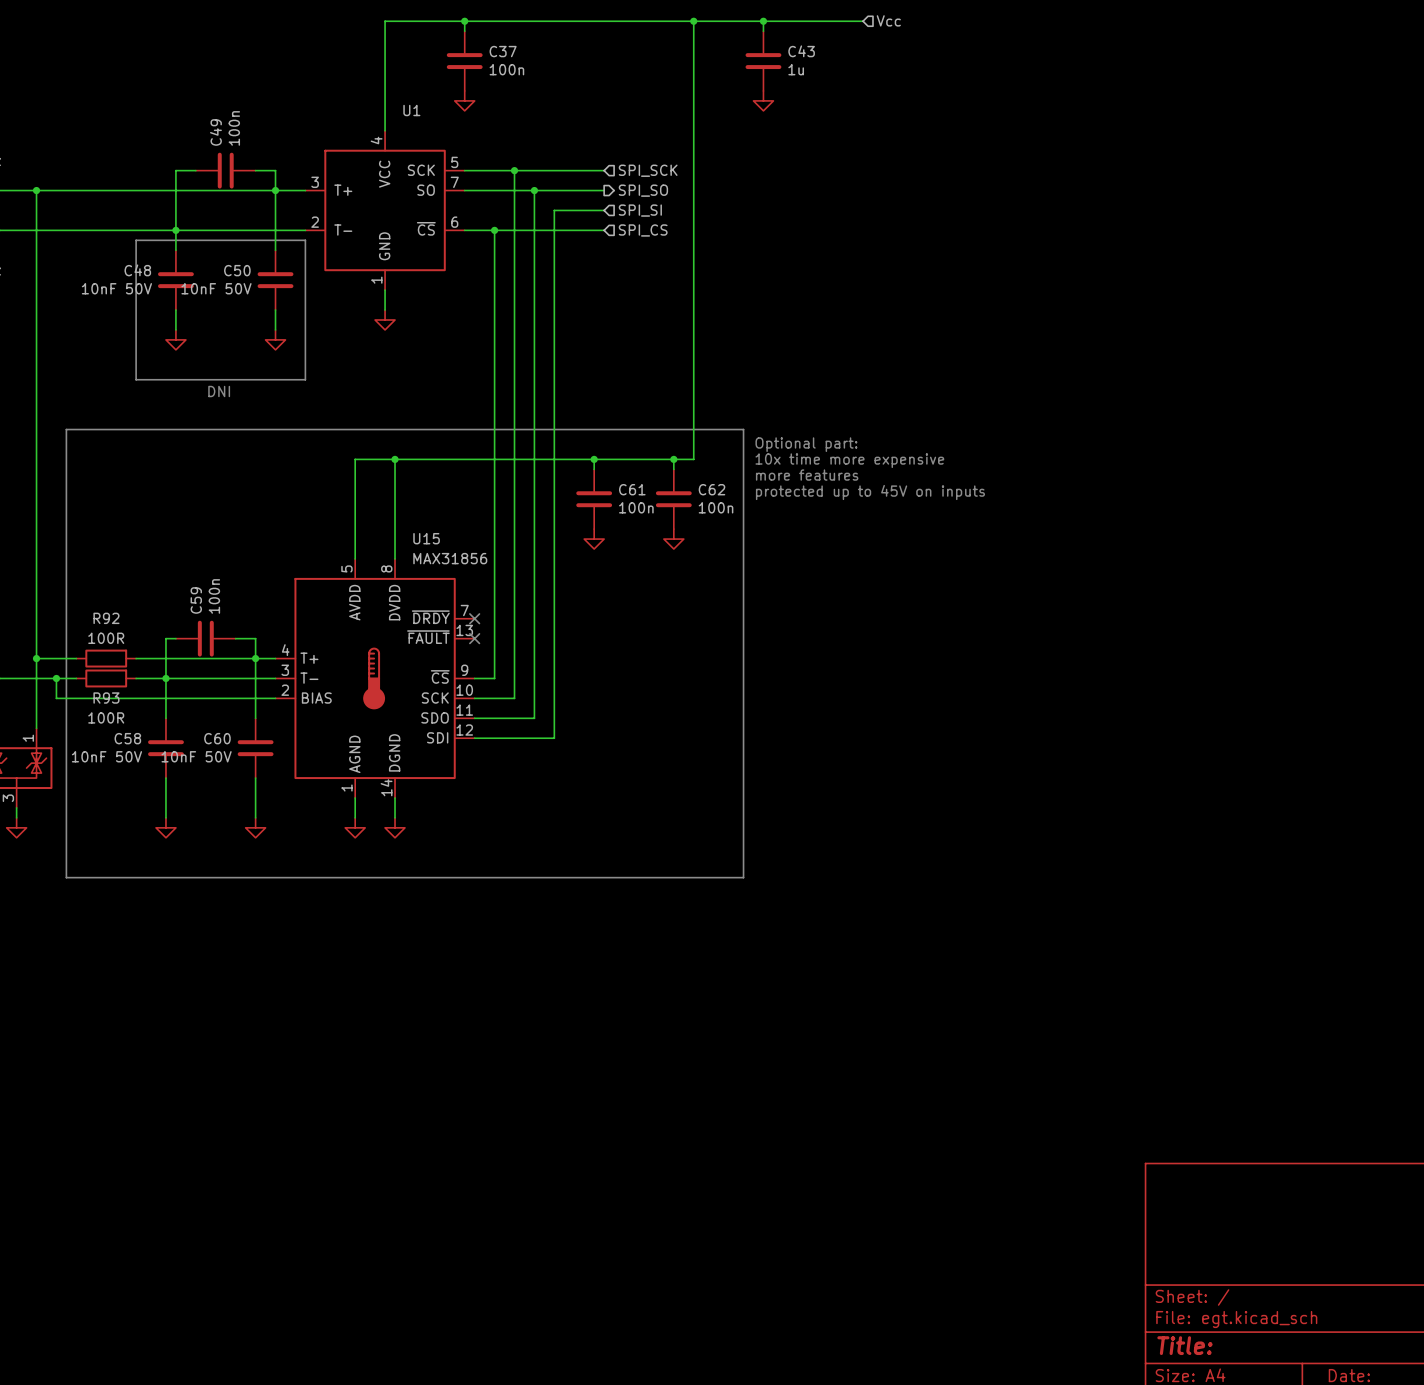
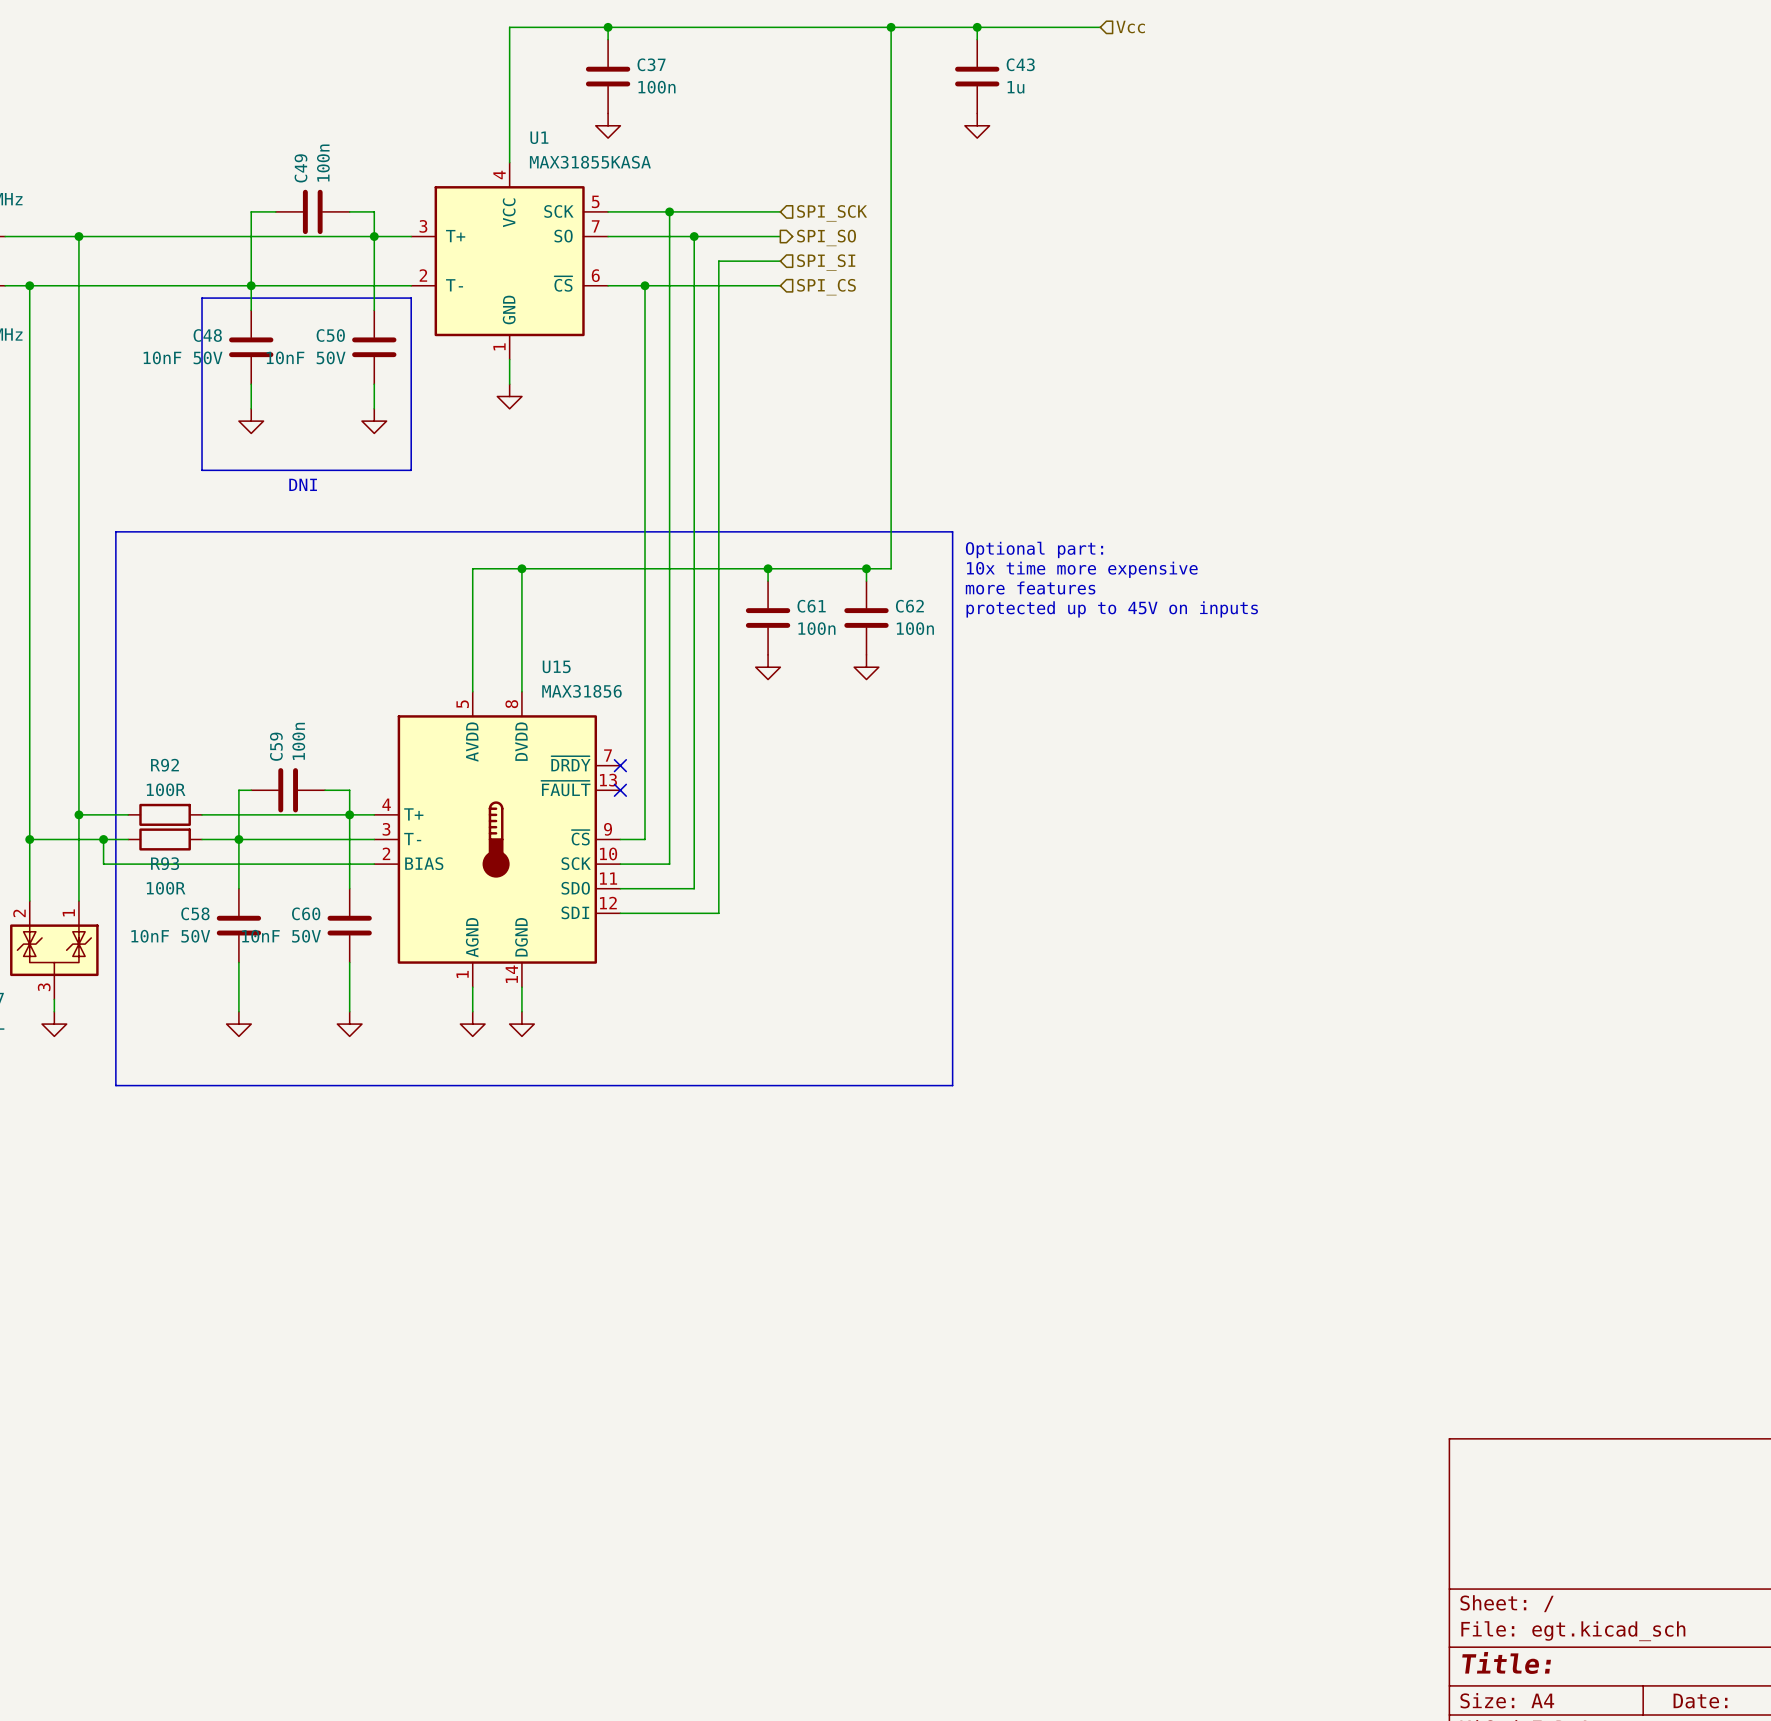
U1 value: none -> MAX31855KASA (590, 162)

